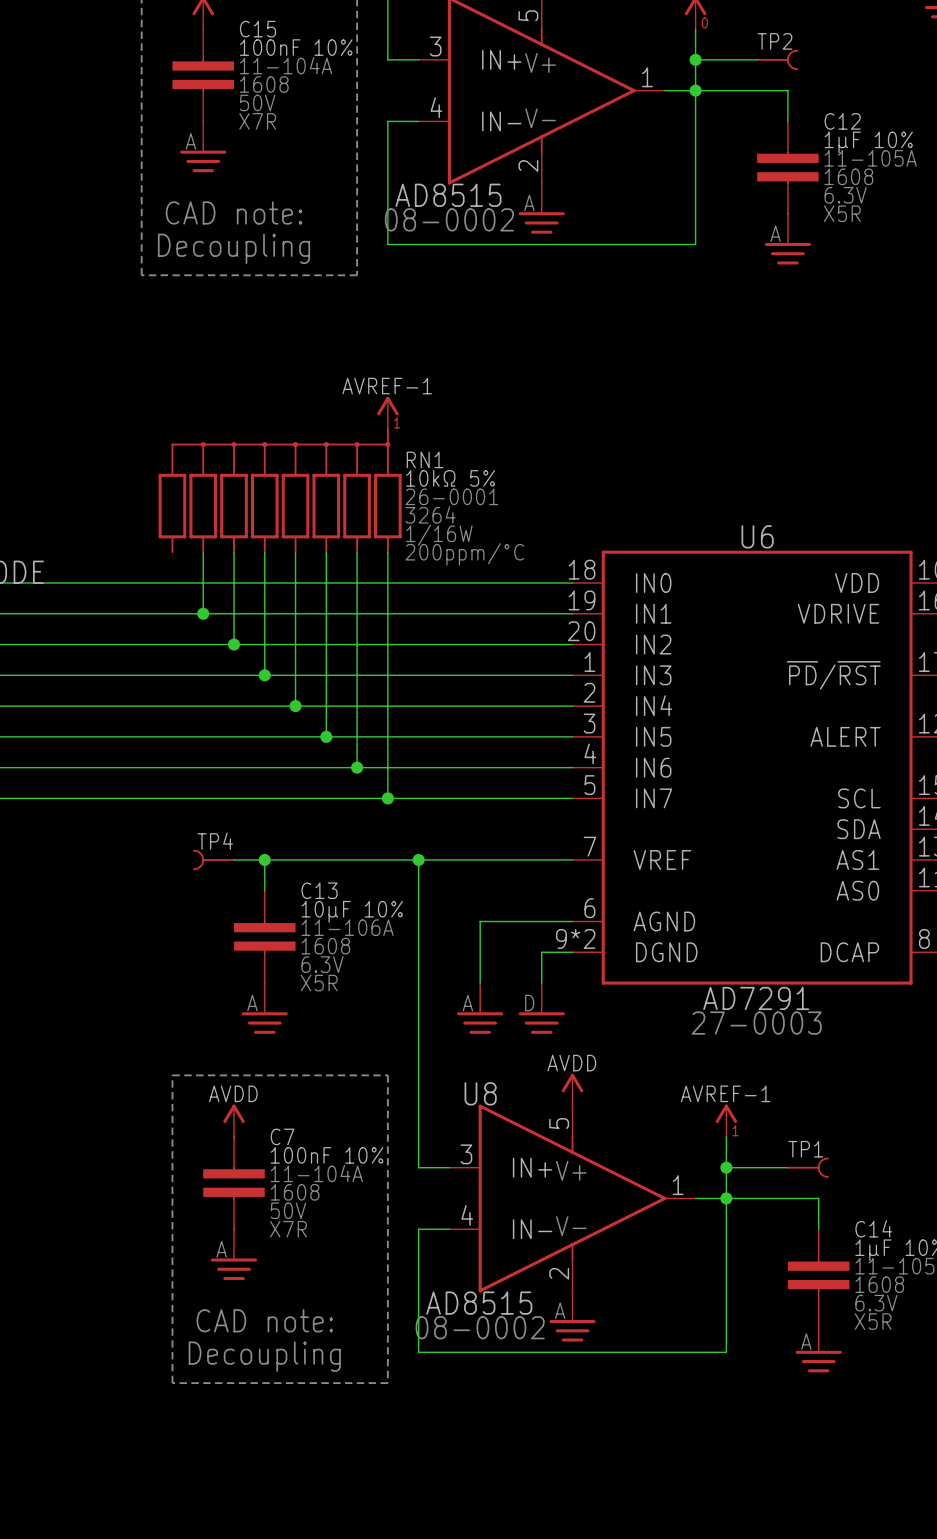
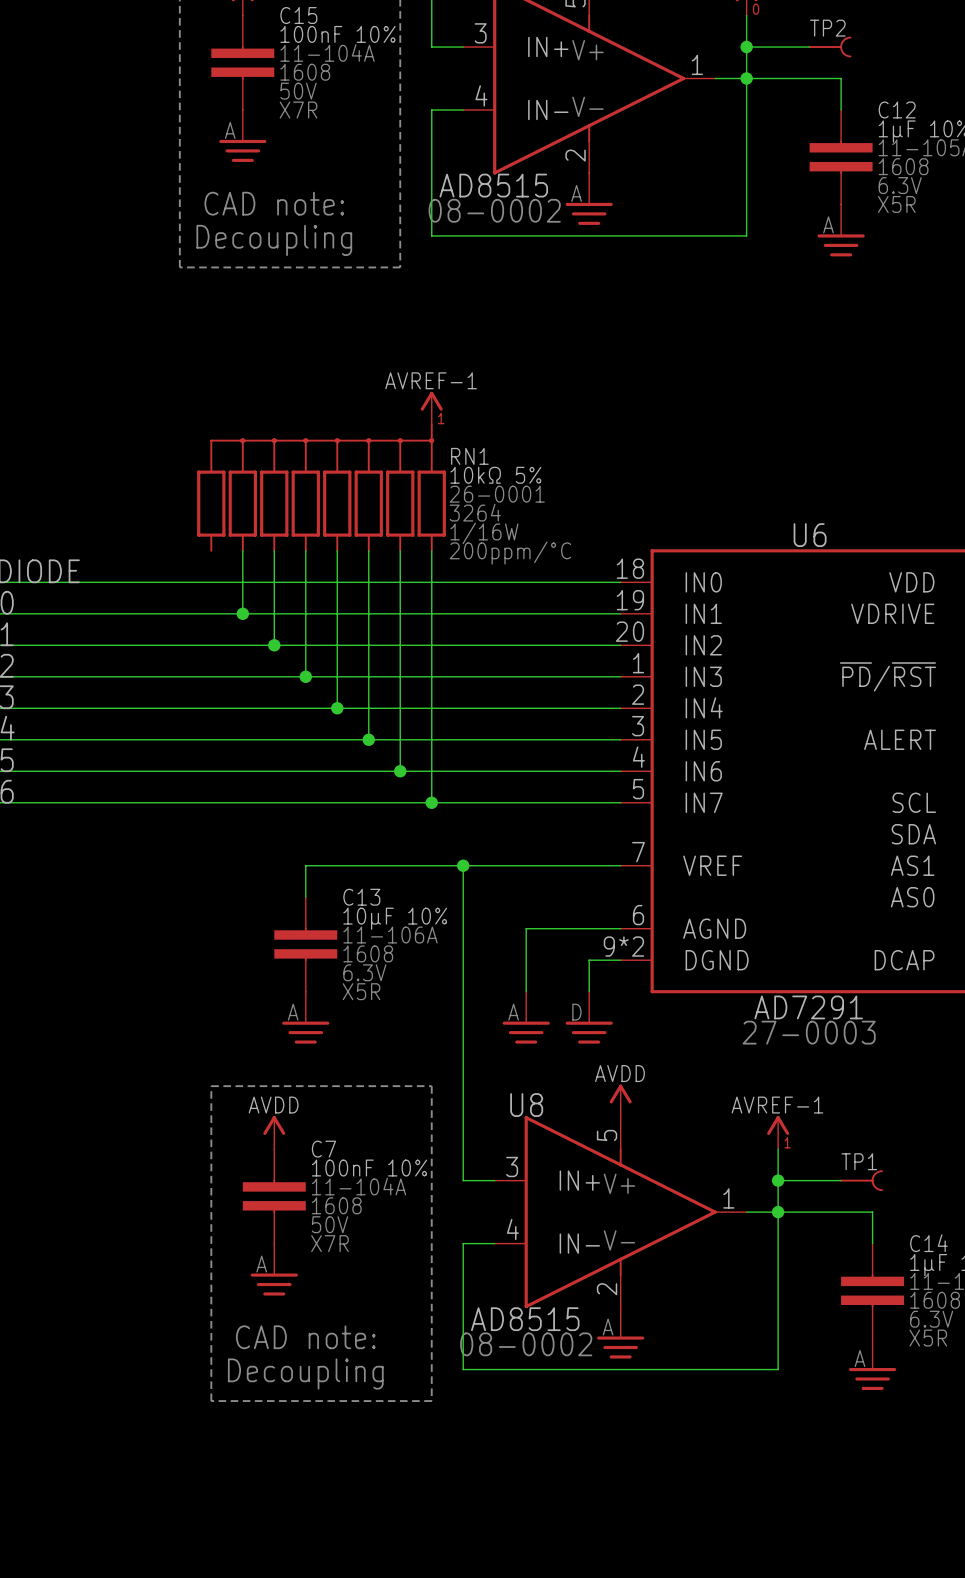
TP4: (214, 859) -> none
wire: (234, 859) (264, 859) -> none
junction: (264, 859) -> none

